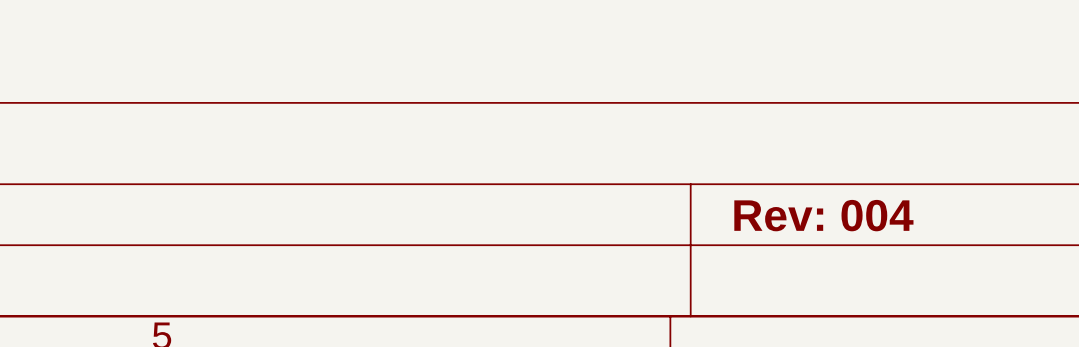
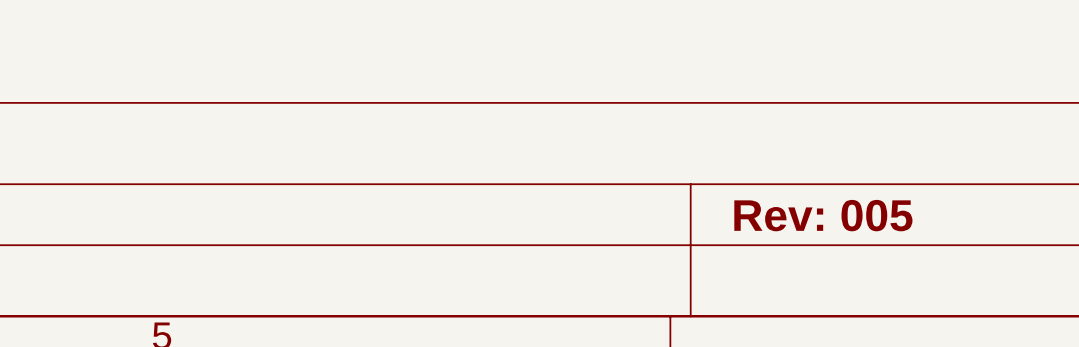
title block: Rev: 004 (823, 215) -> Rev: 005 (823, 215)

